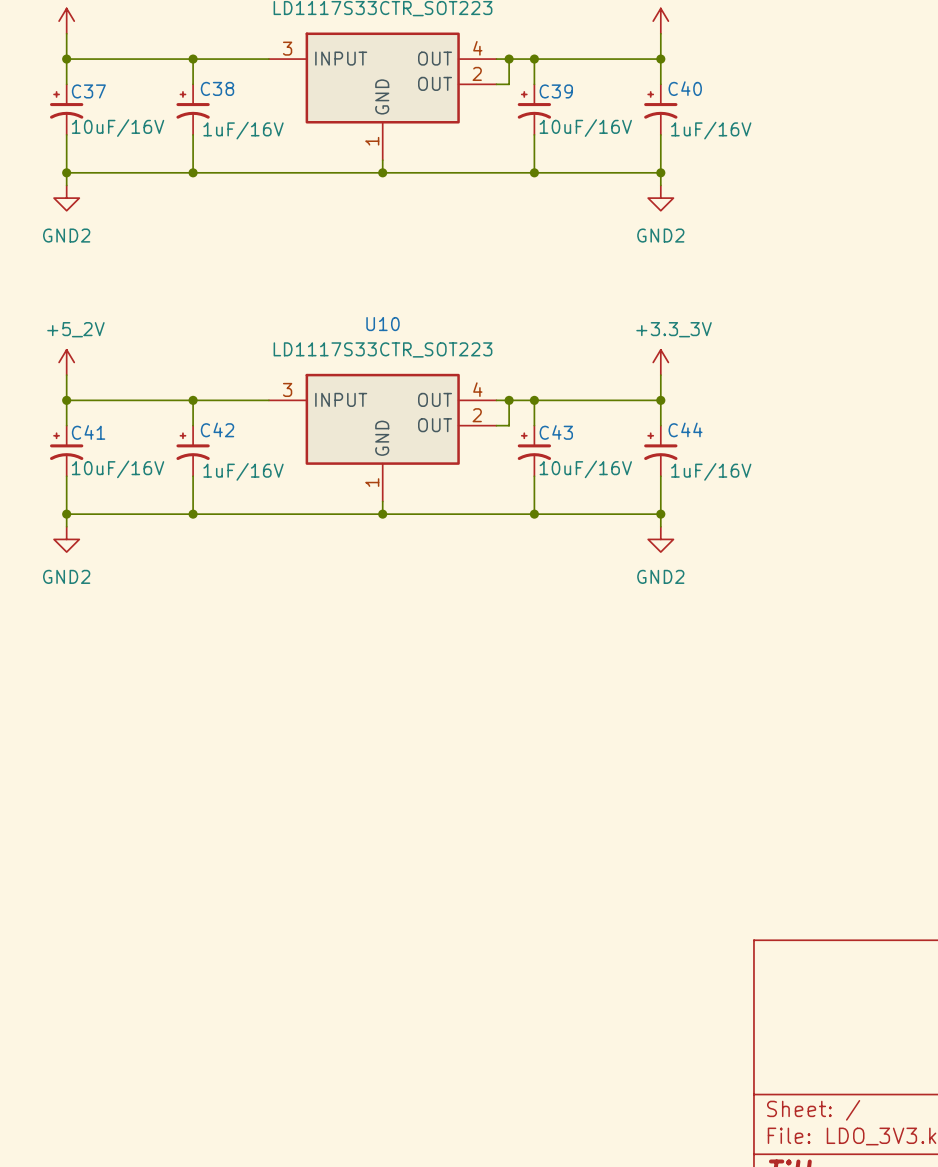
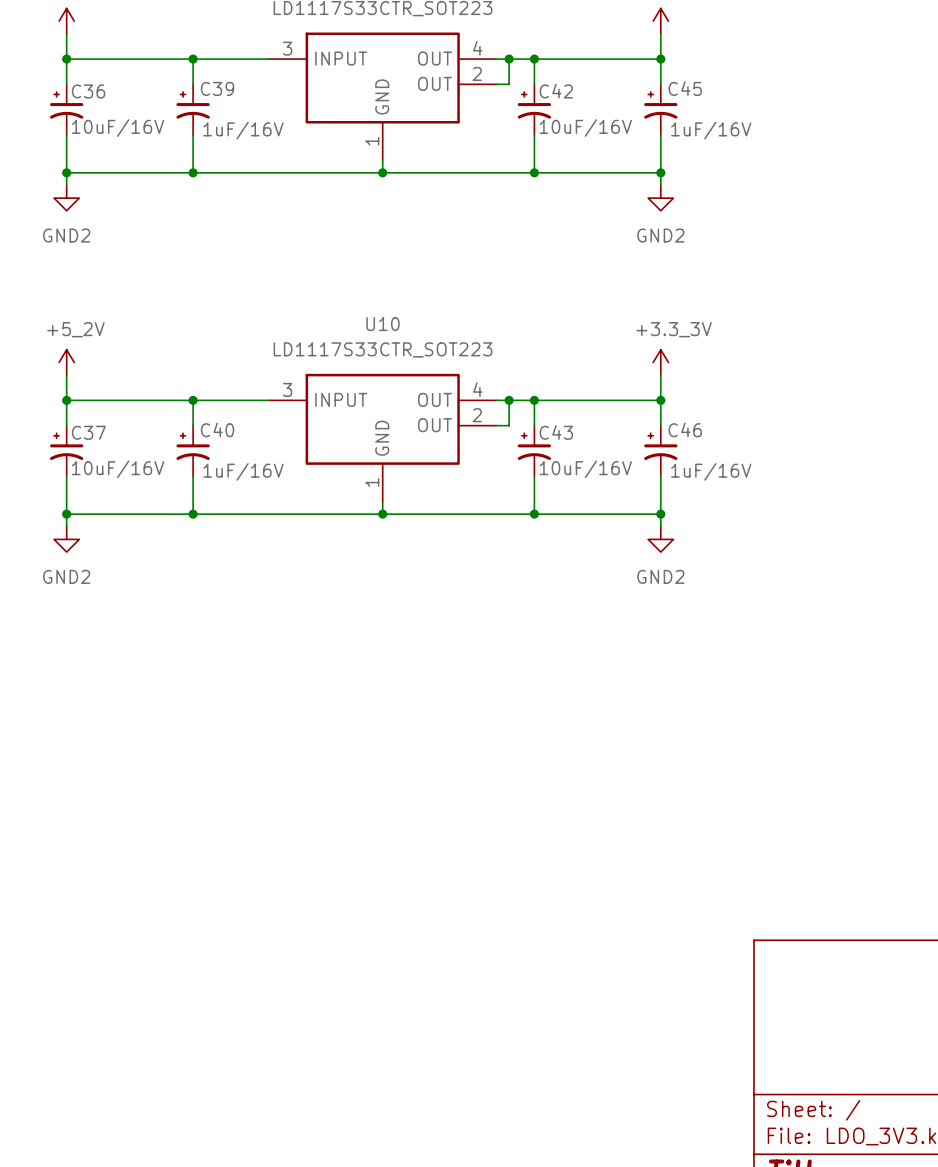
C38 name: C38 (217, 88) -> C39 (217, 88)
C40 name: C40 (685, 88) -> C45 (685, 88)
C37 name: C37 (88, 91) -> C36 (88, 91)
C39 name: C39 (556, 91) -> C42 (556, 91)
C42 name: C42 (217, 429) -> C40 (217, 429)
C44 name: C44 (685, 429) -> C46 (685, 429)
C41 name: C41 (88, 432) -> C37 (88, 432)

